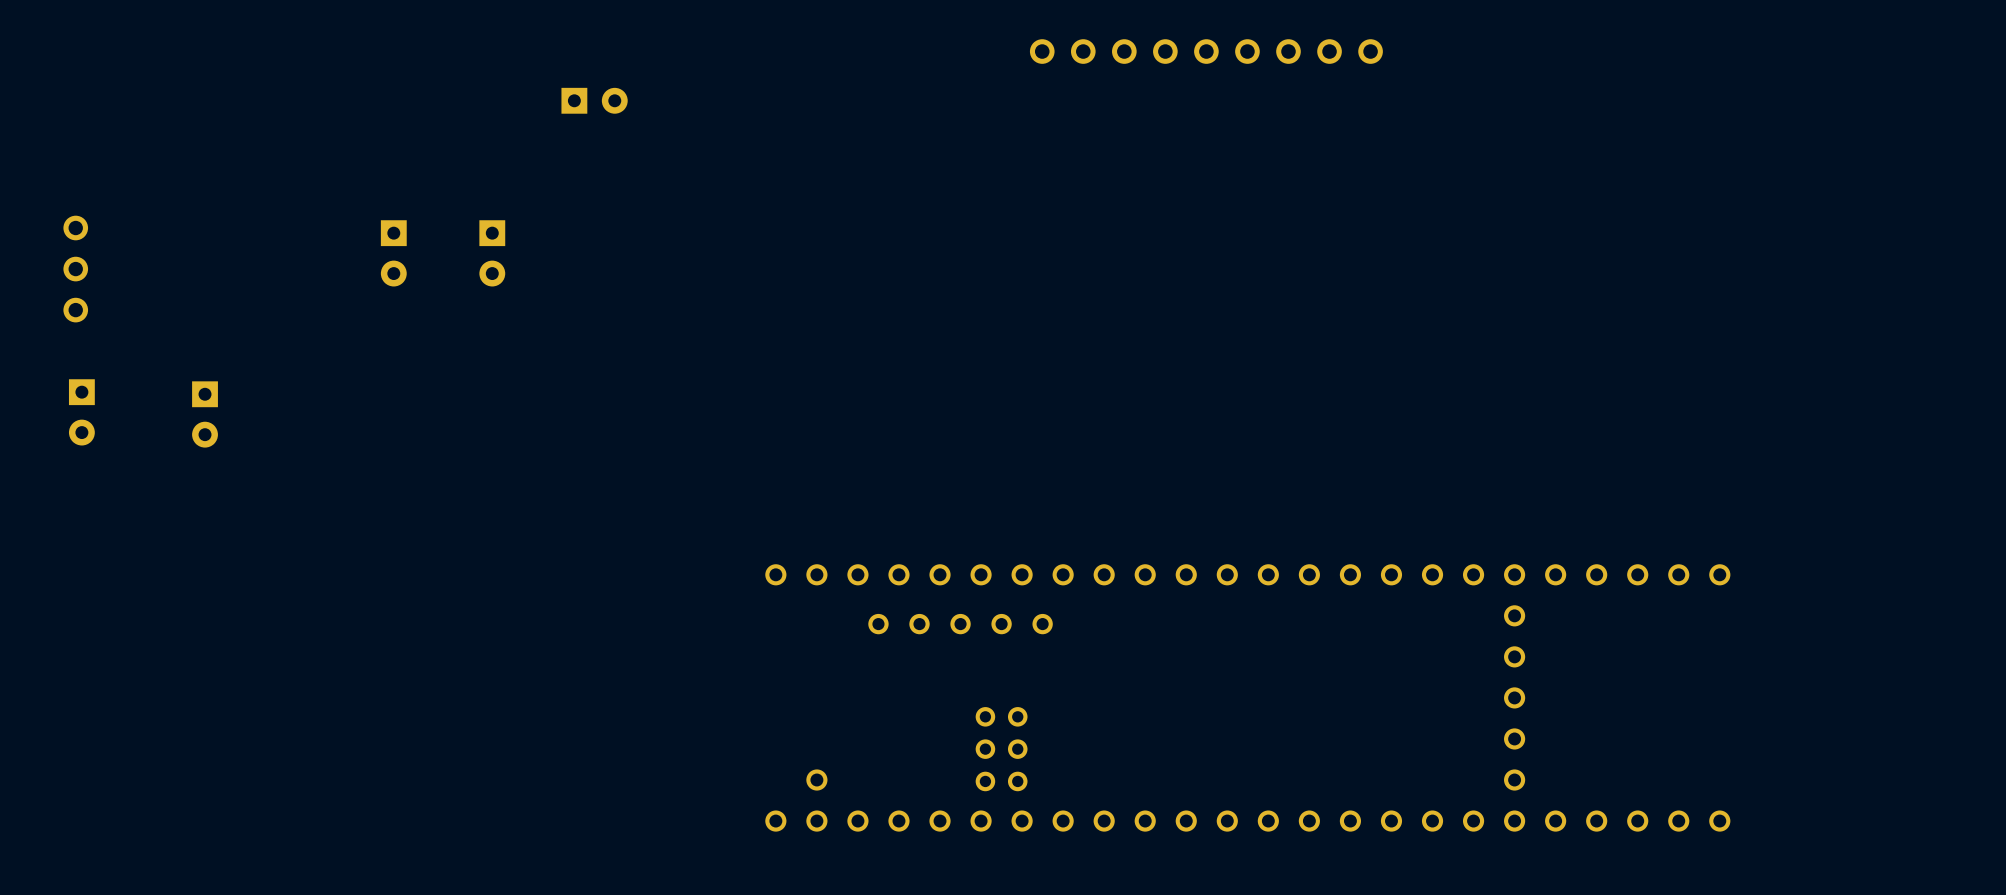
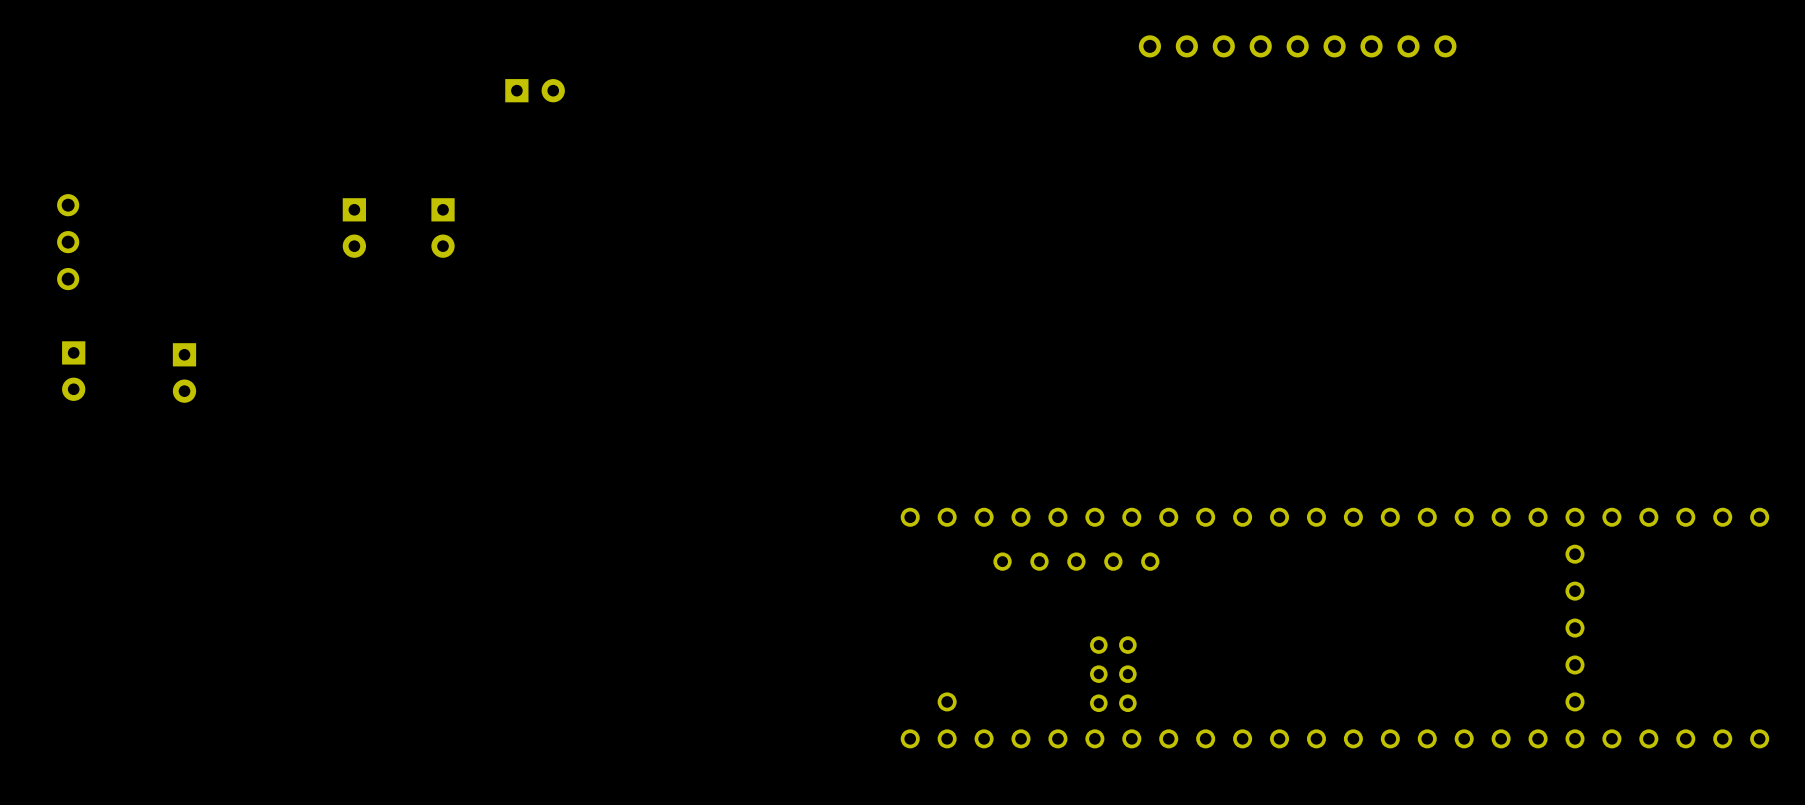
part position: (1206, 51) -> (1297, 46)
part position: (1247, 697) -> (1334, 628)

